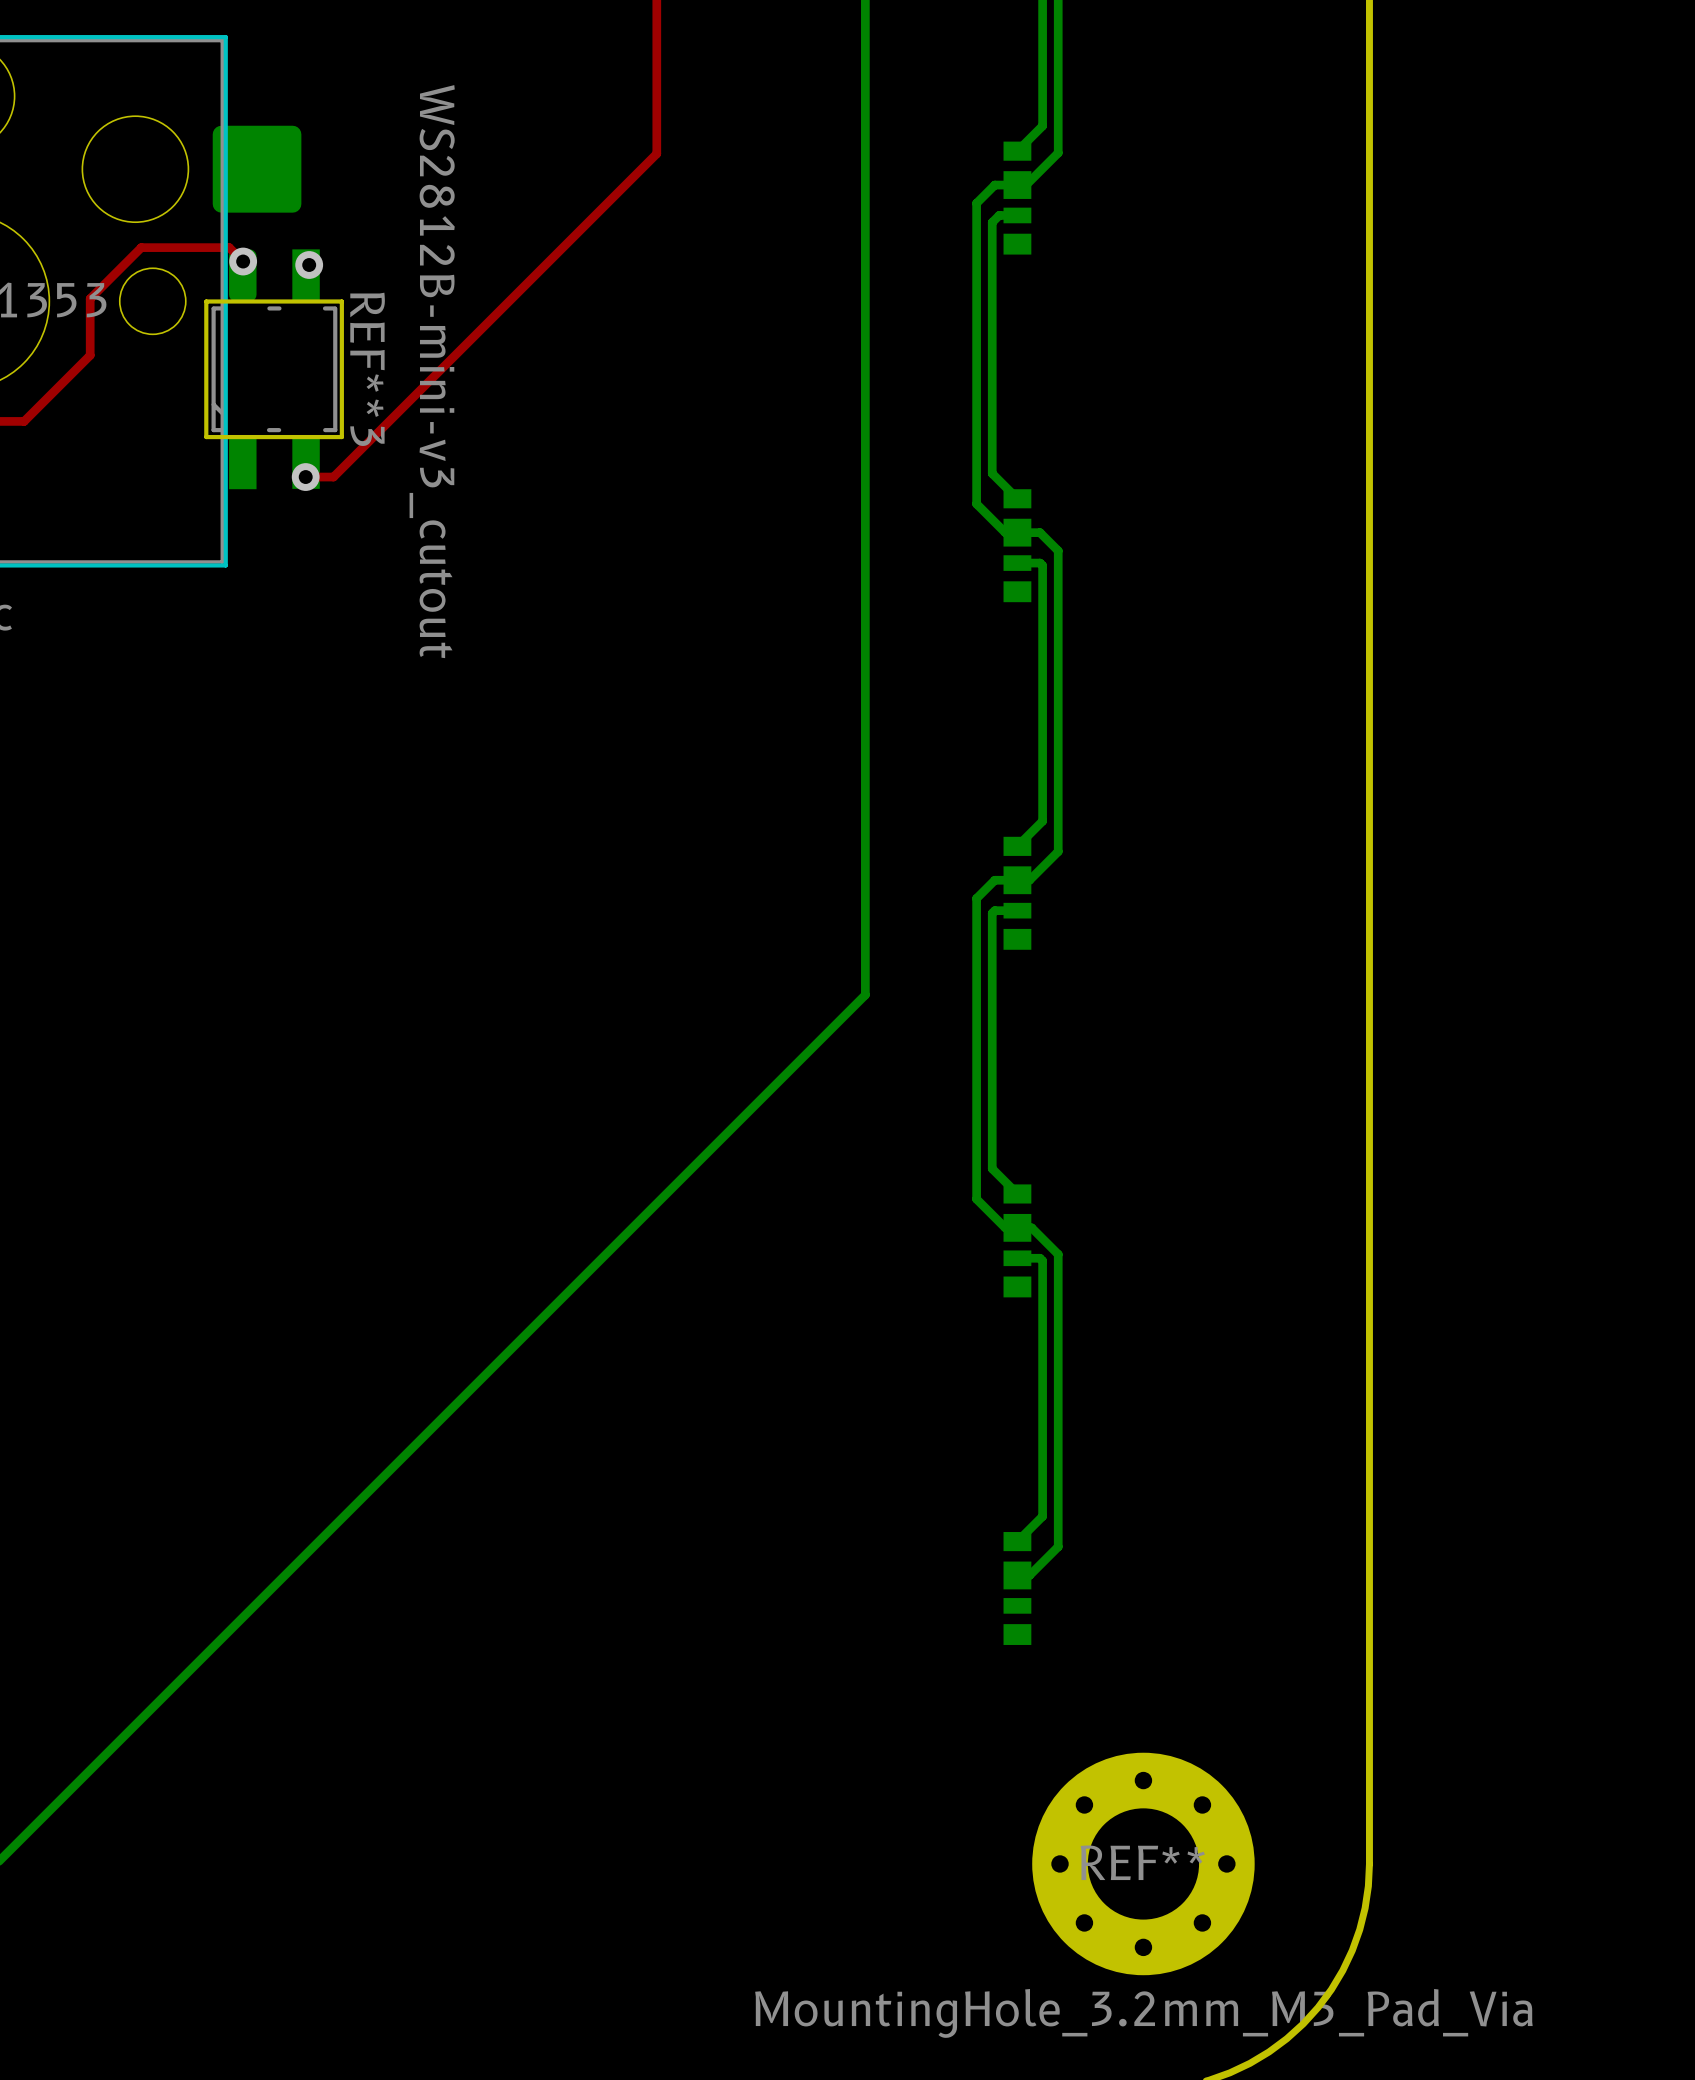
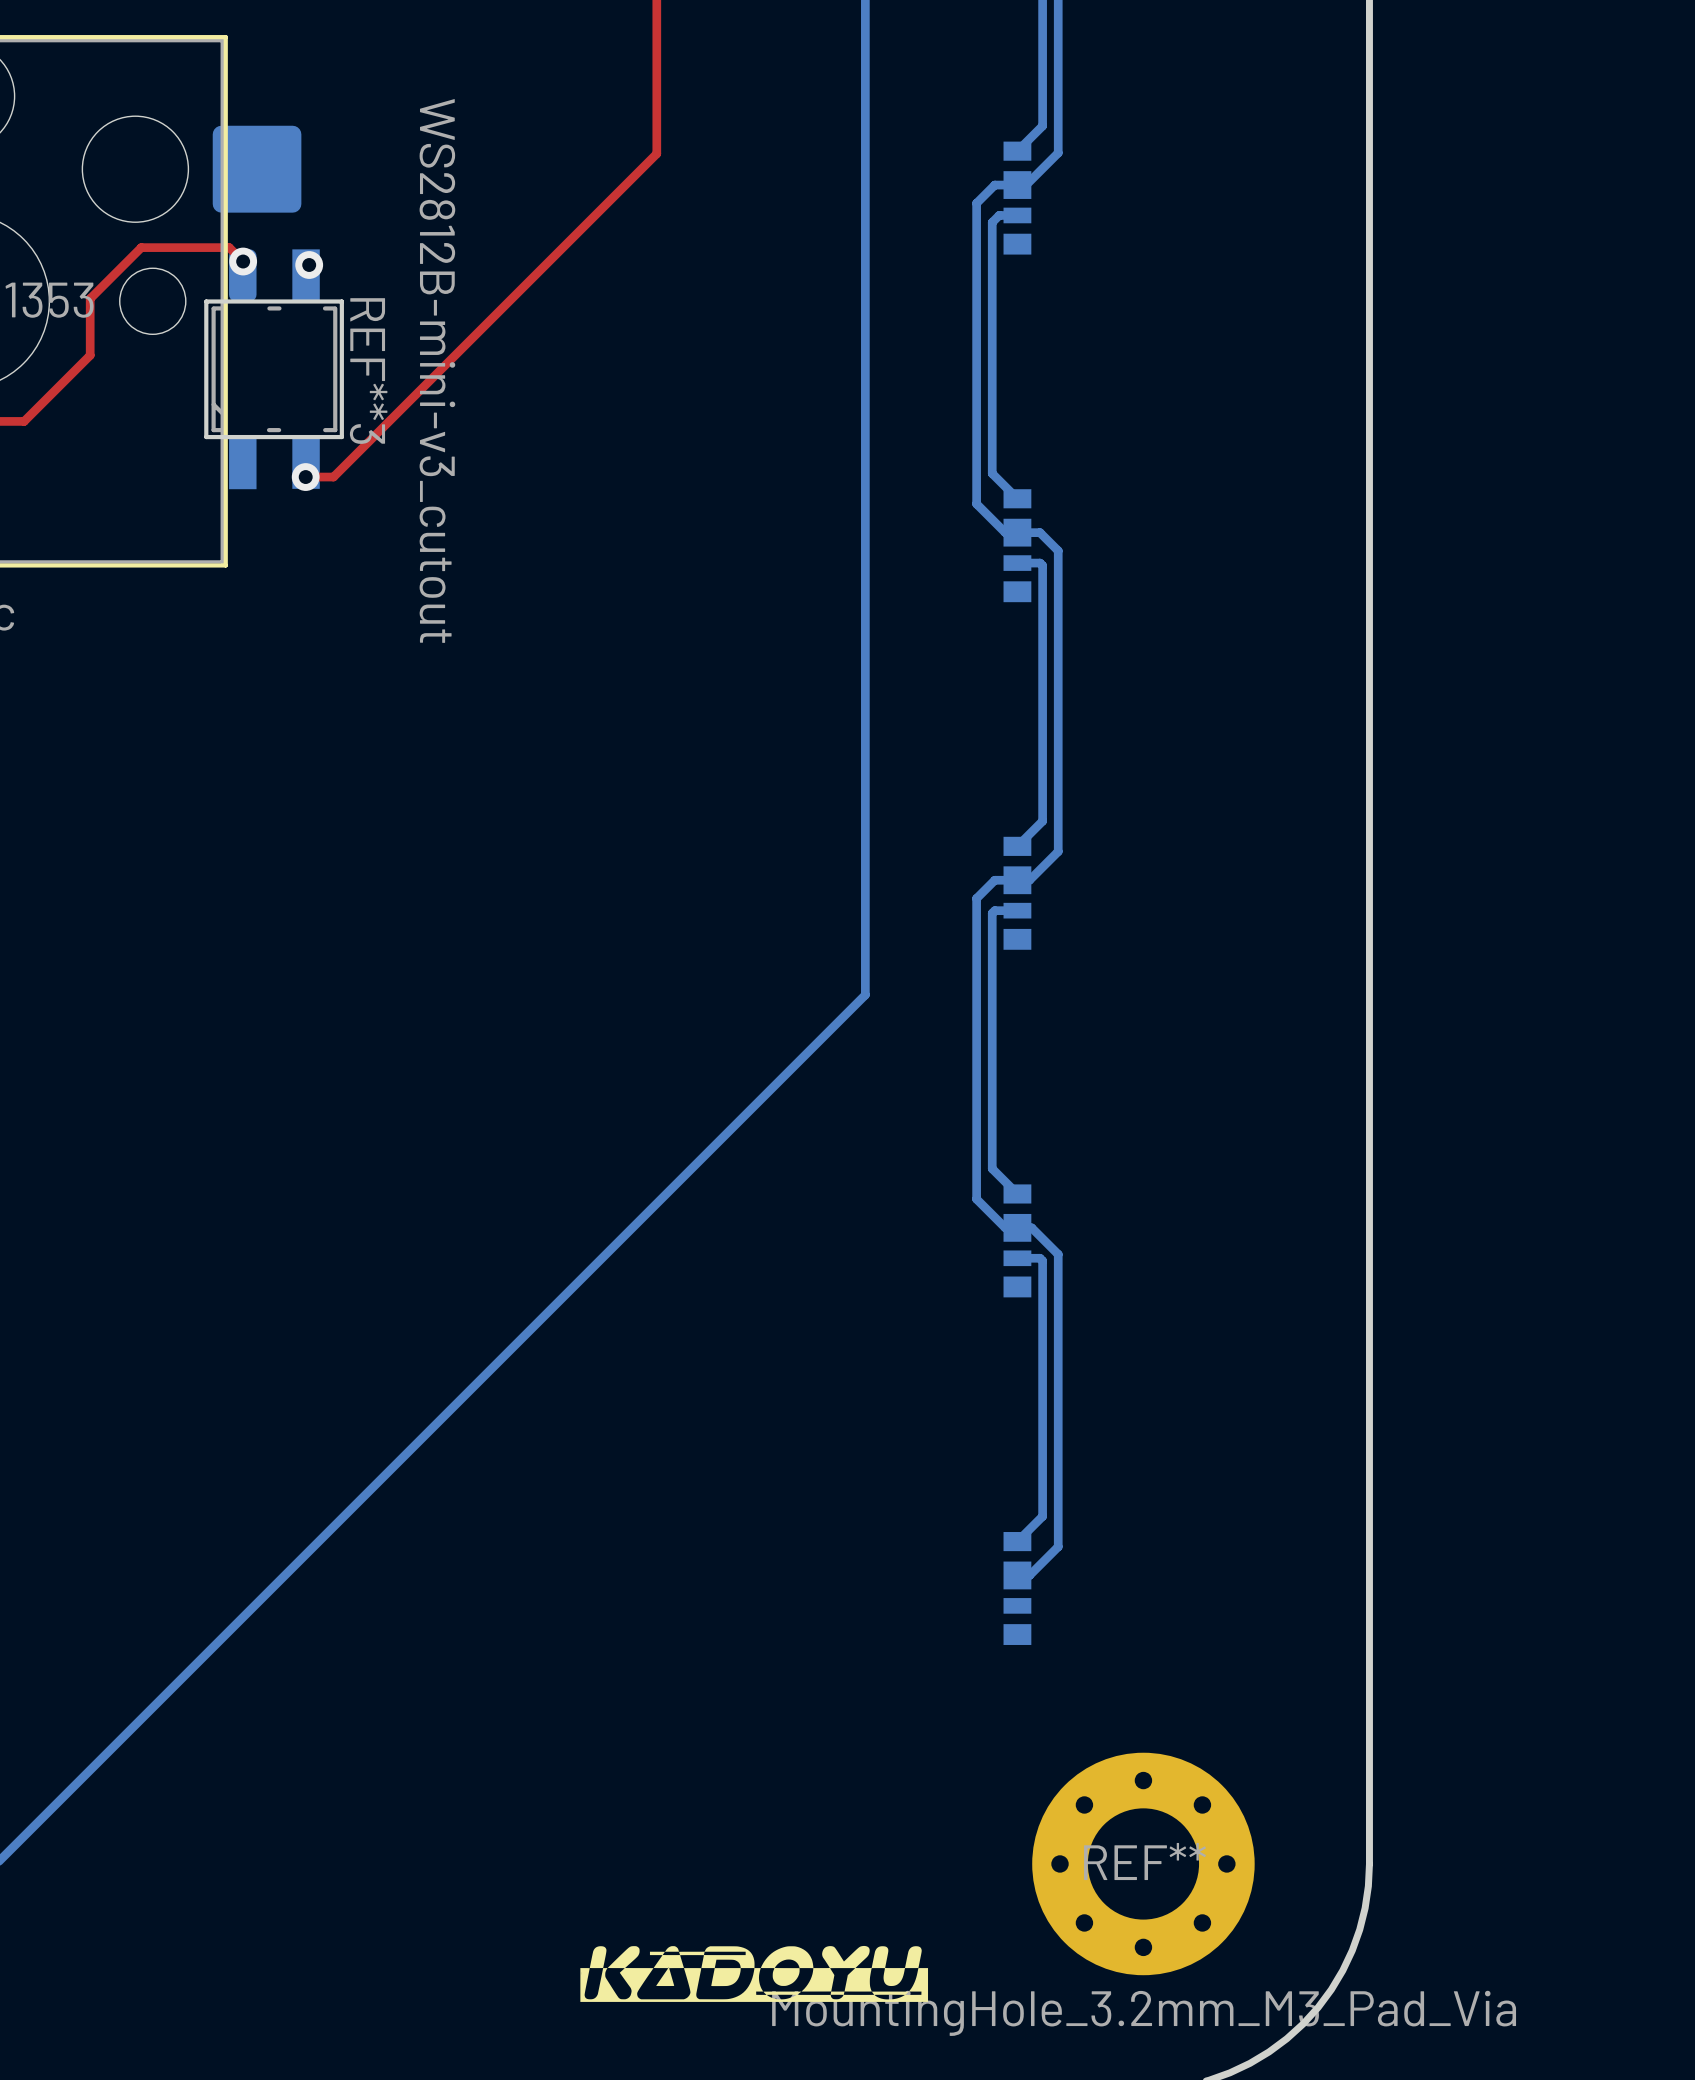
drawing: none -> [580, 1945, 929, 2002]

